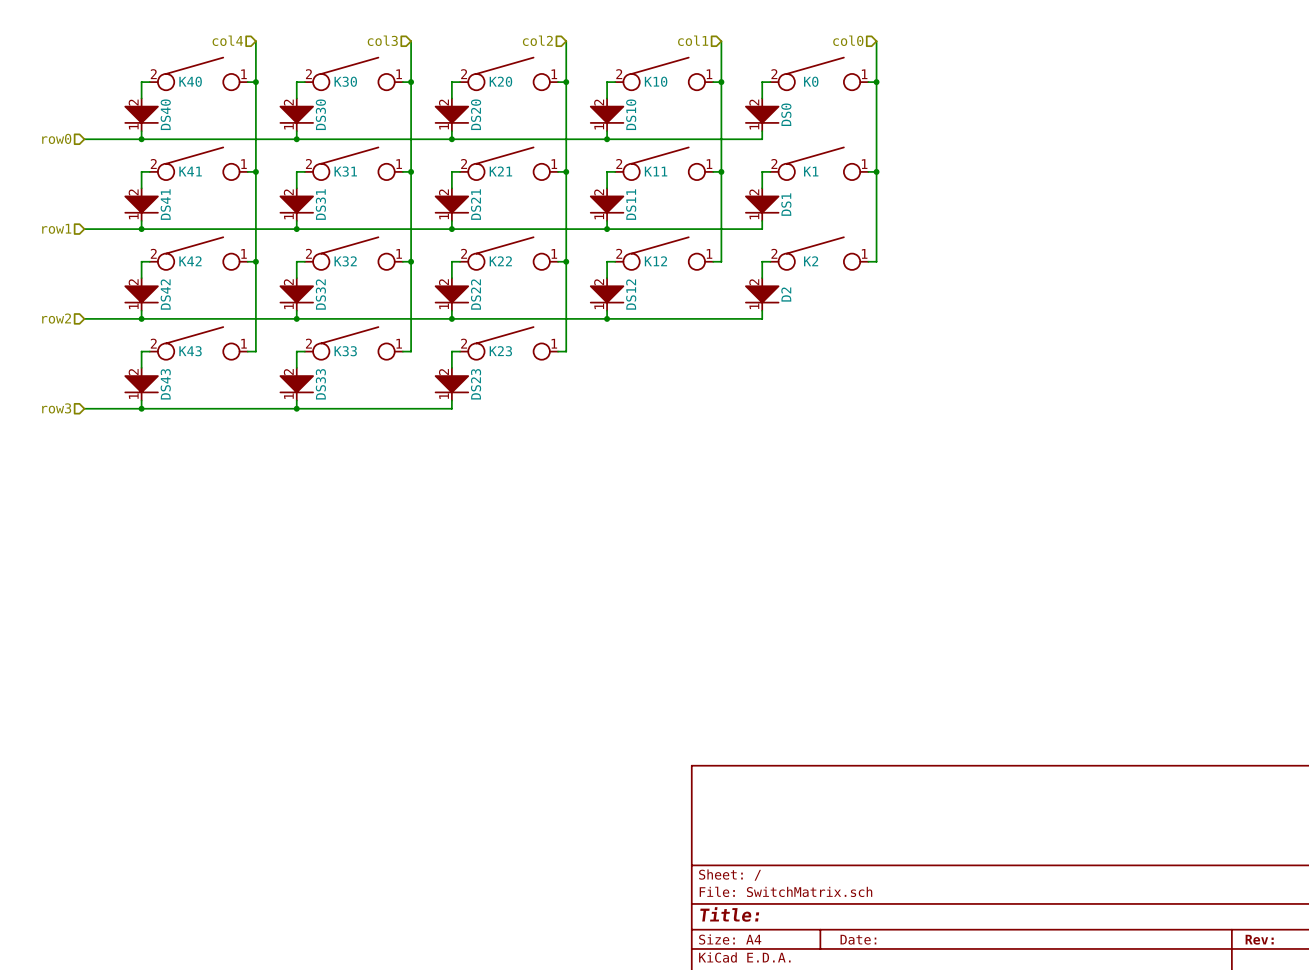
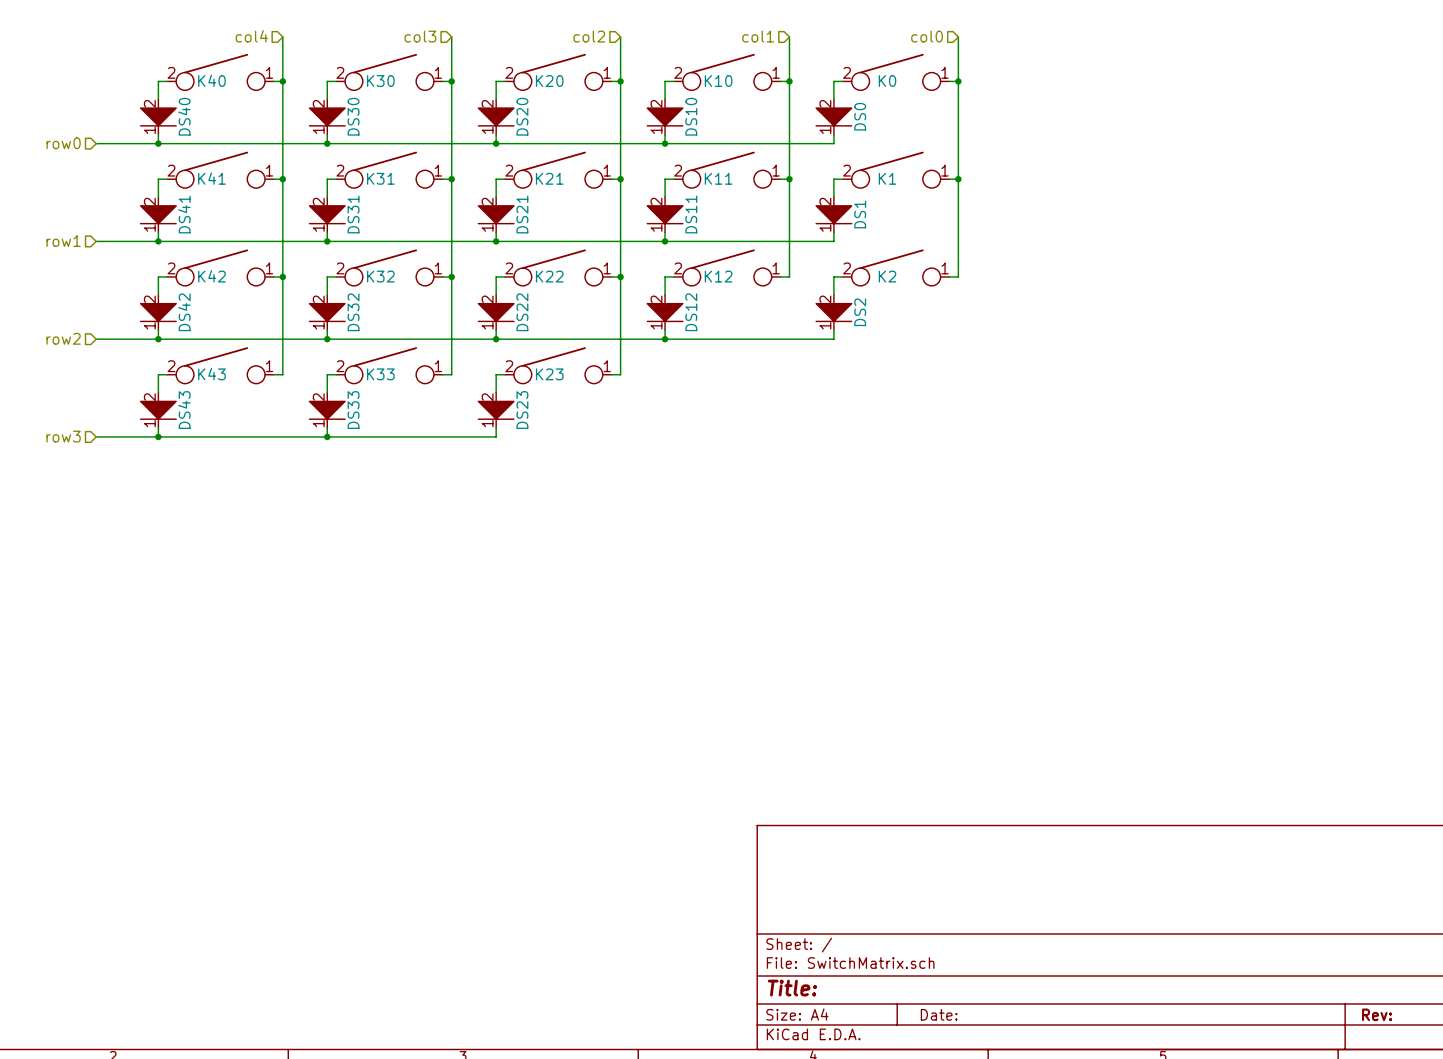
D2 name: D2 (786, 294) -> DS2 (860, 312)

